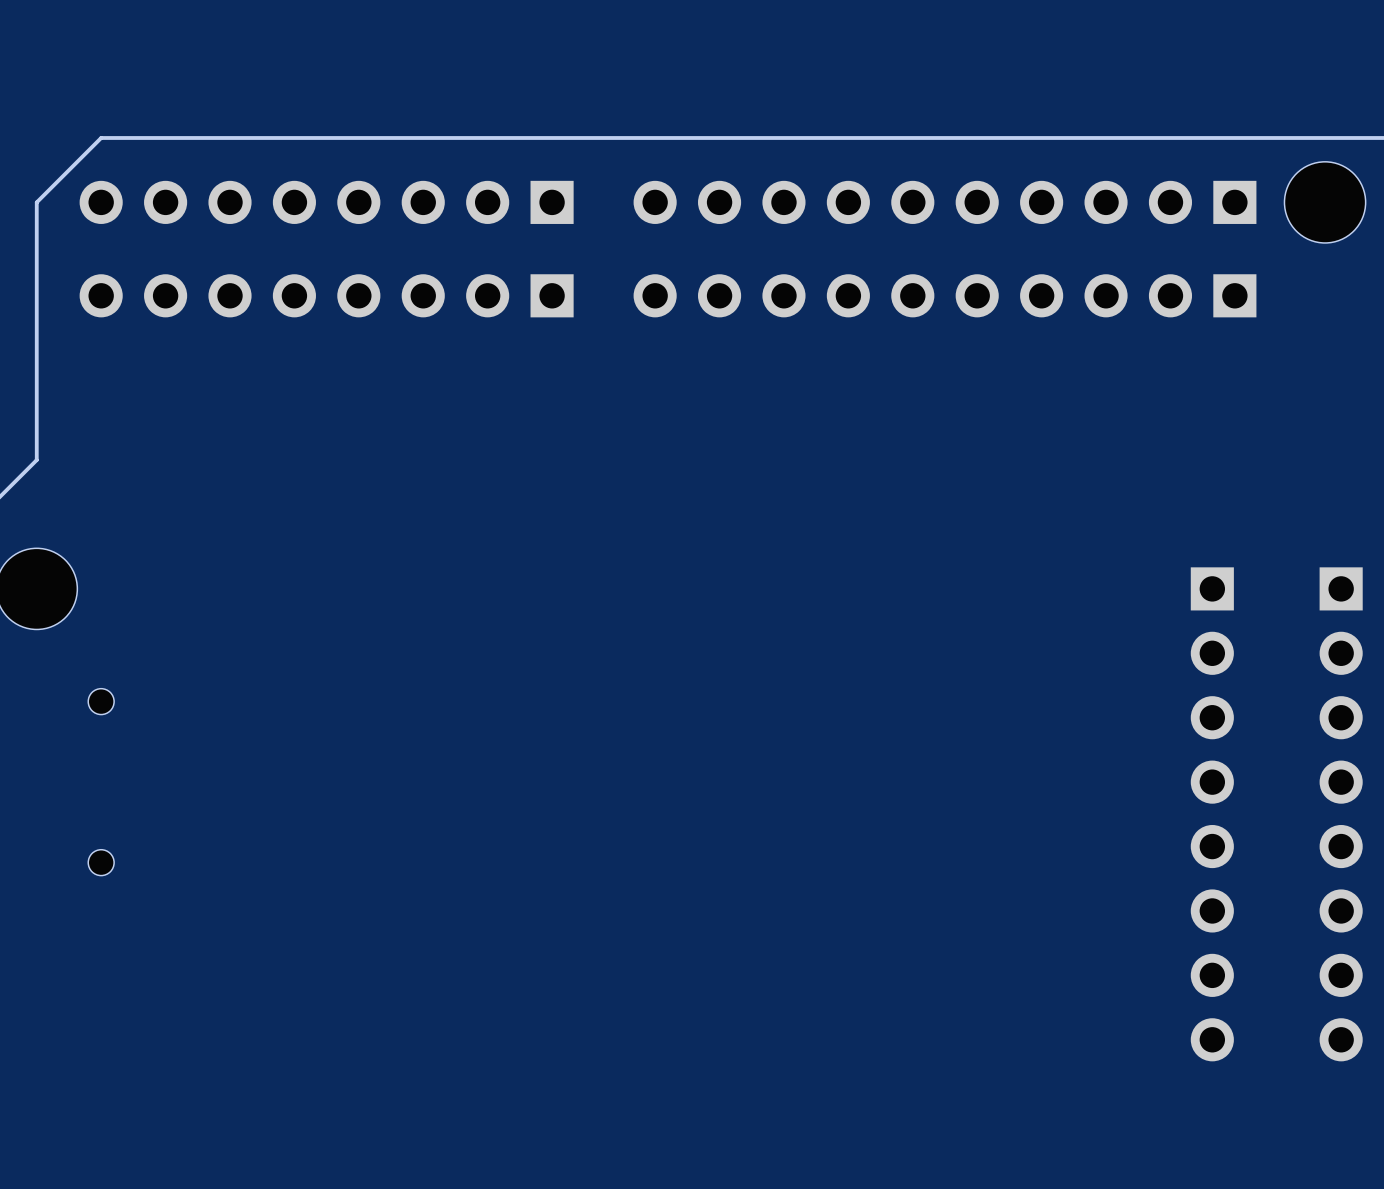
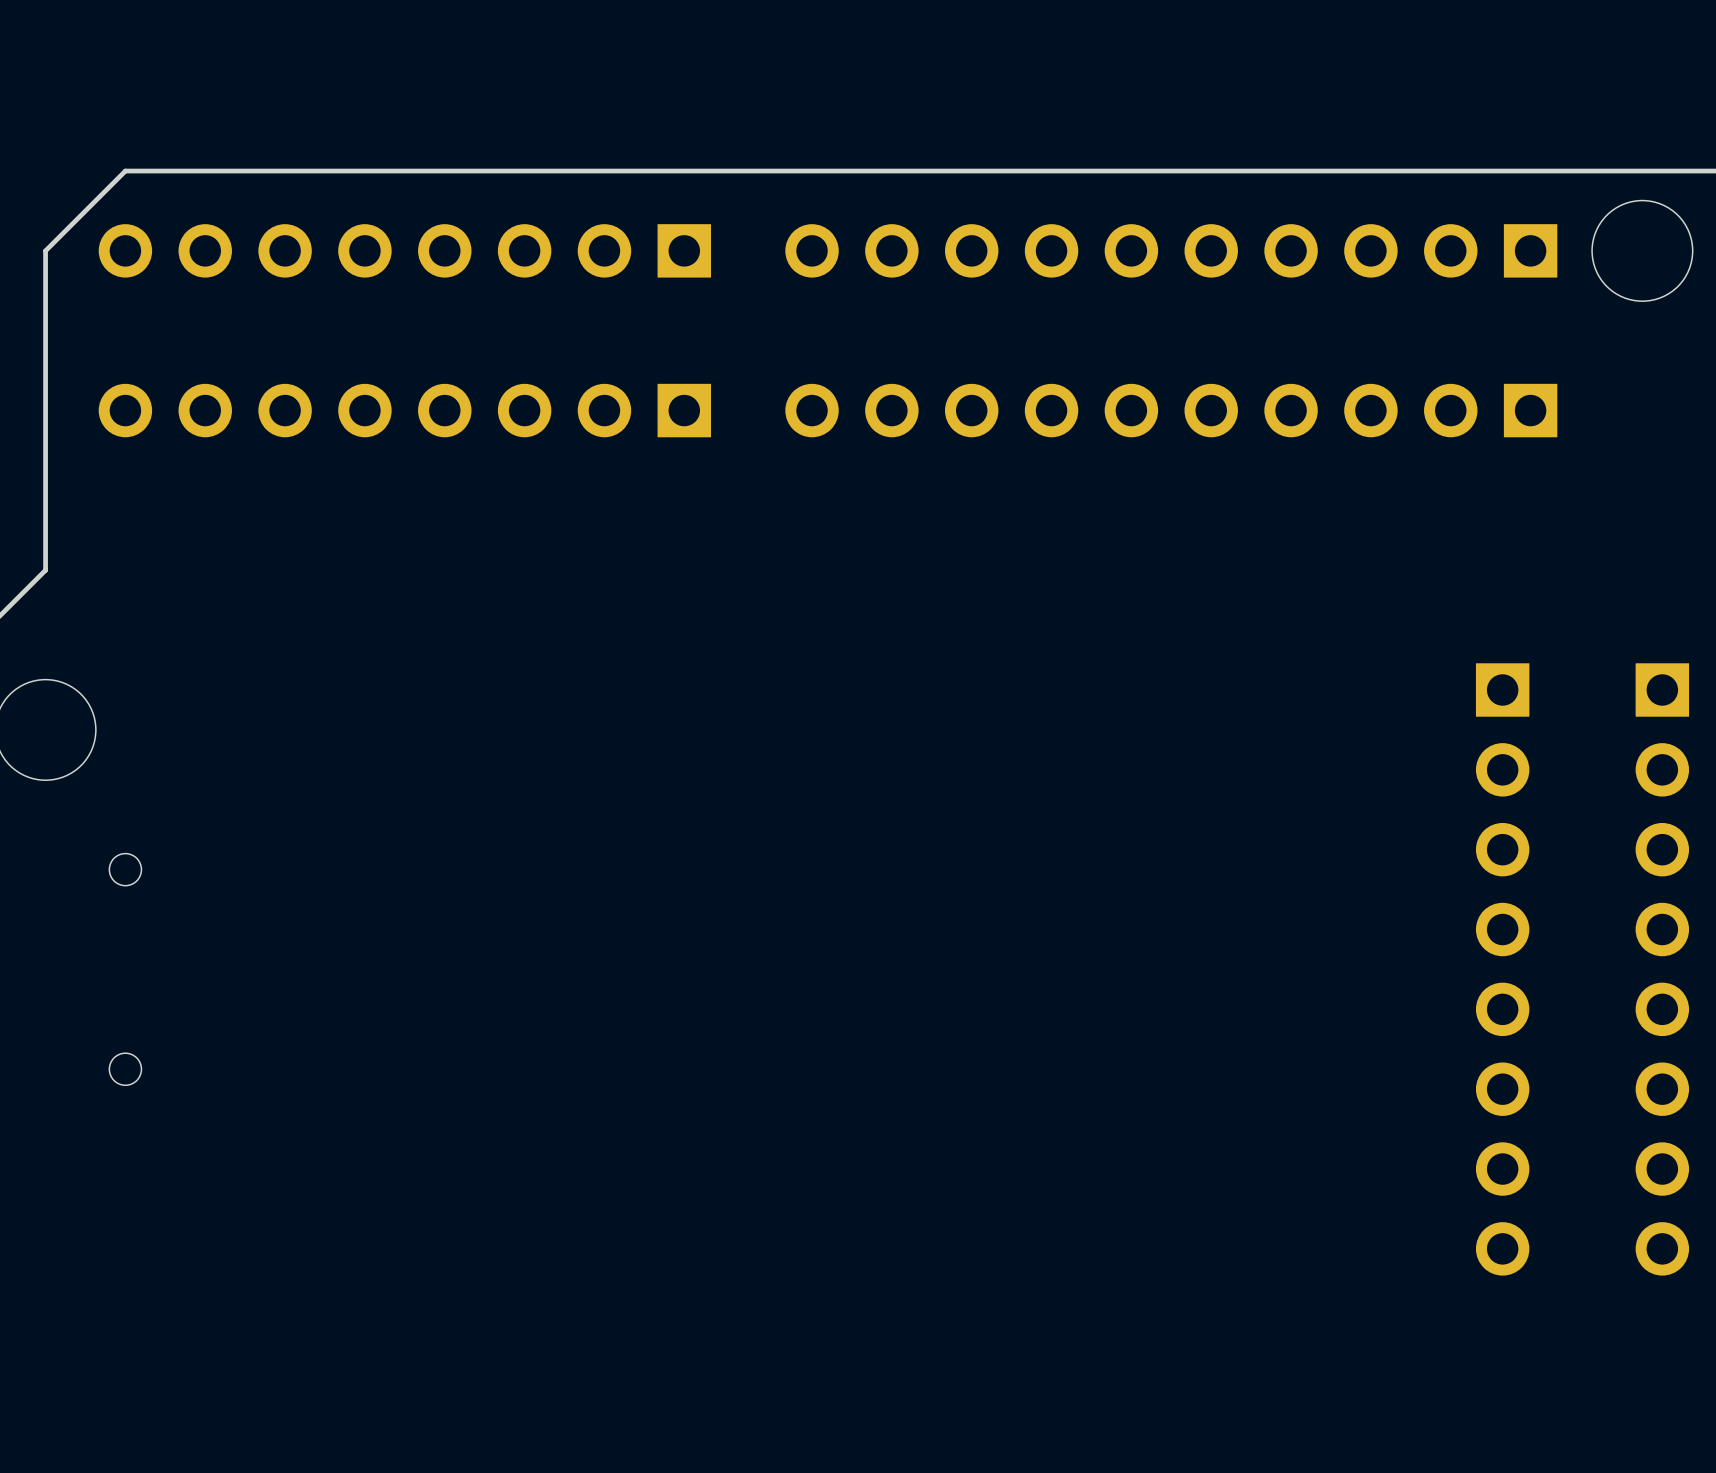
part position: (326, 295) -> (404, 410)
part position: (945, 295) -> (1171, 410)
part position: (1212, 814) -> (1502, 969)
part position: (1341, 814) -> (1662, 969)

